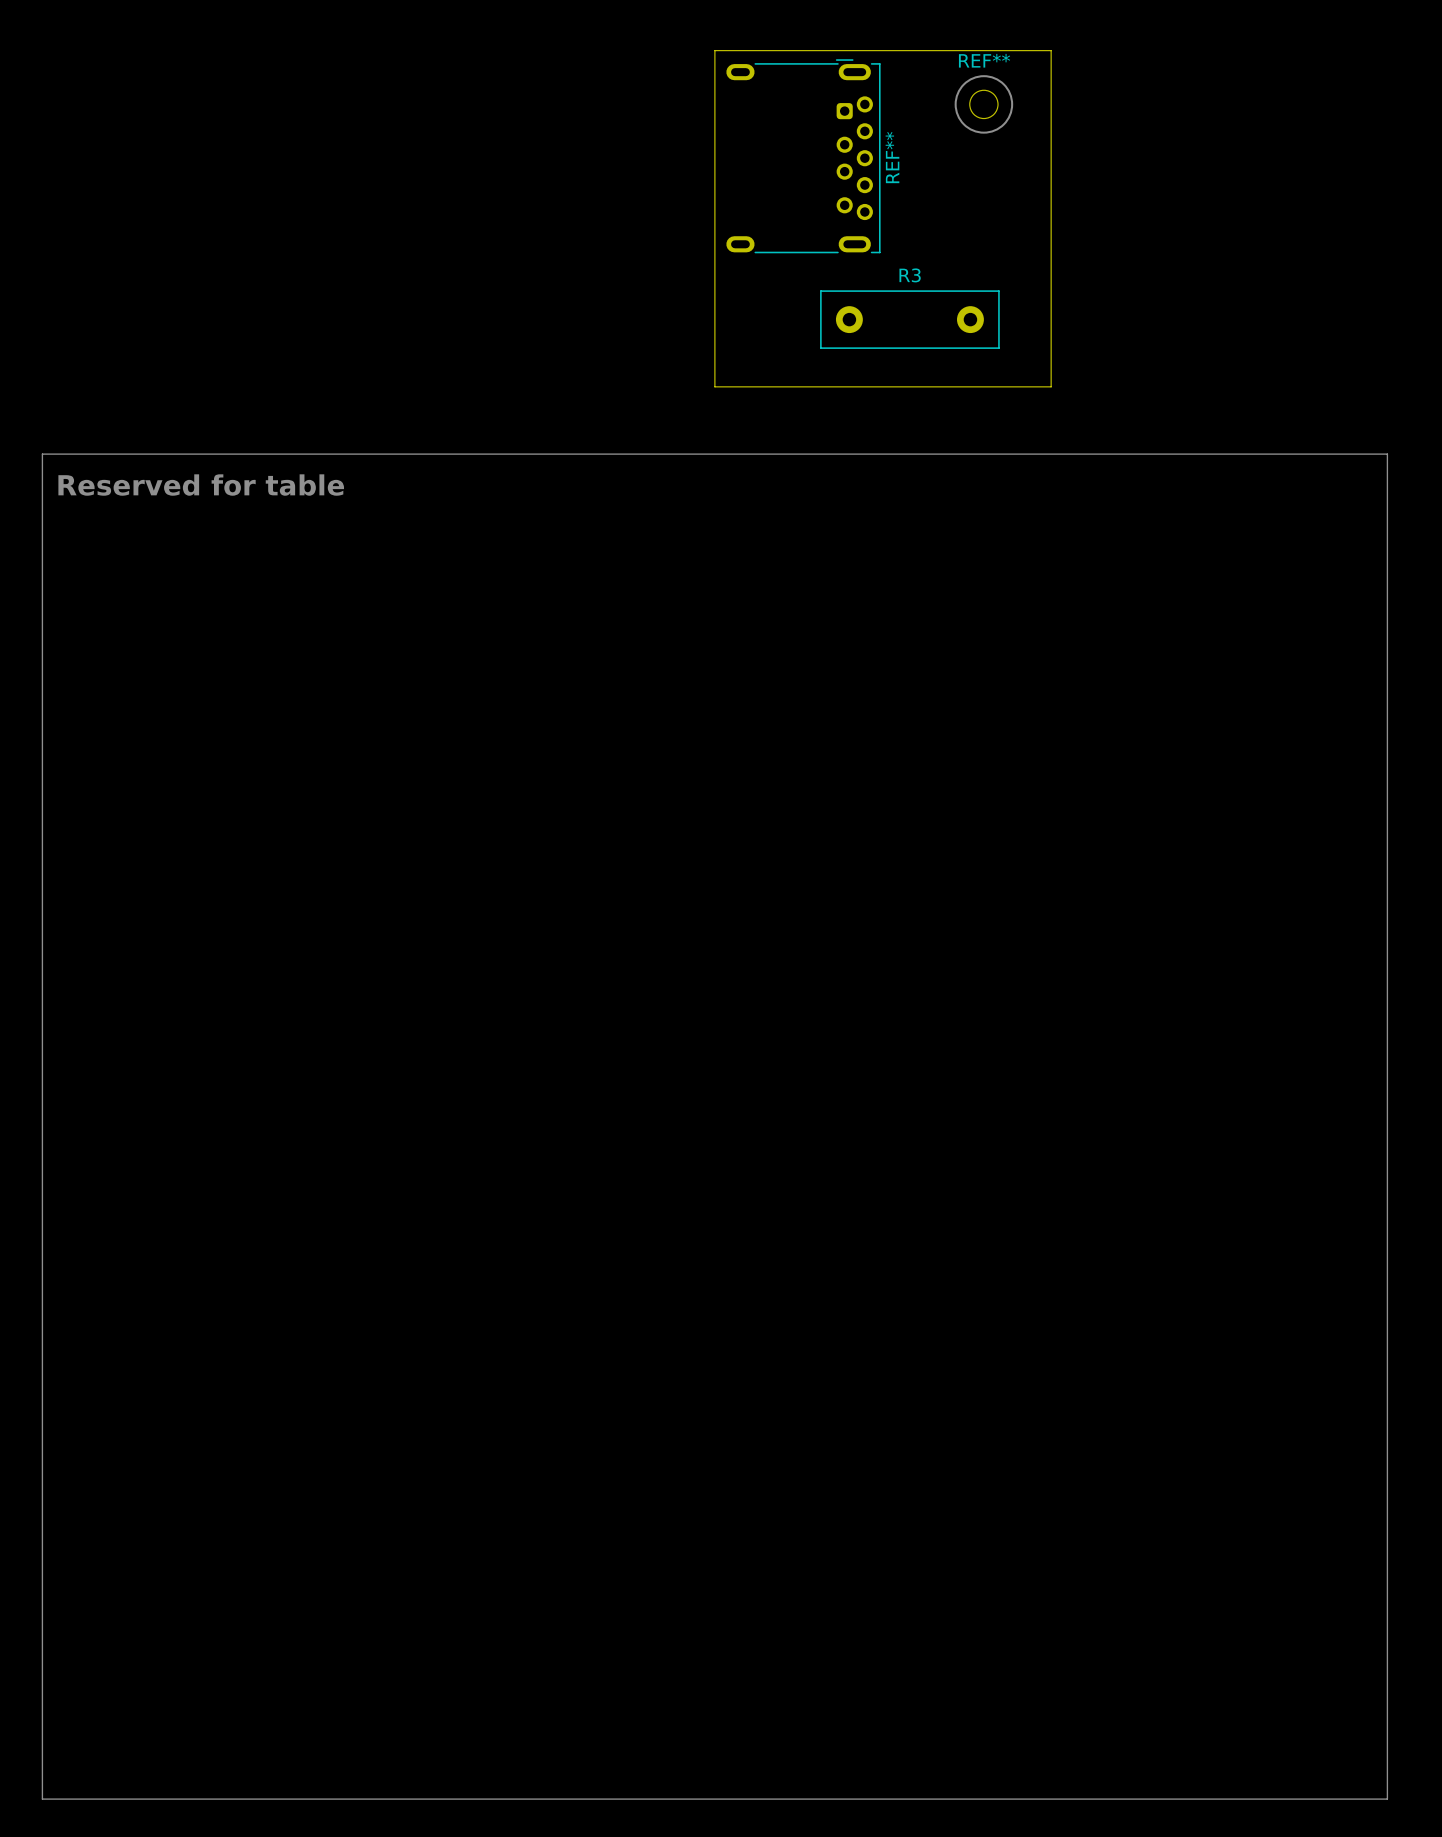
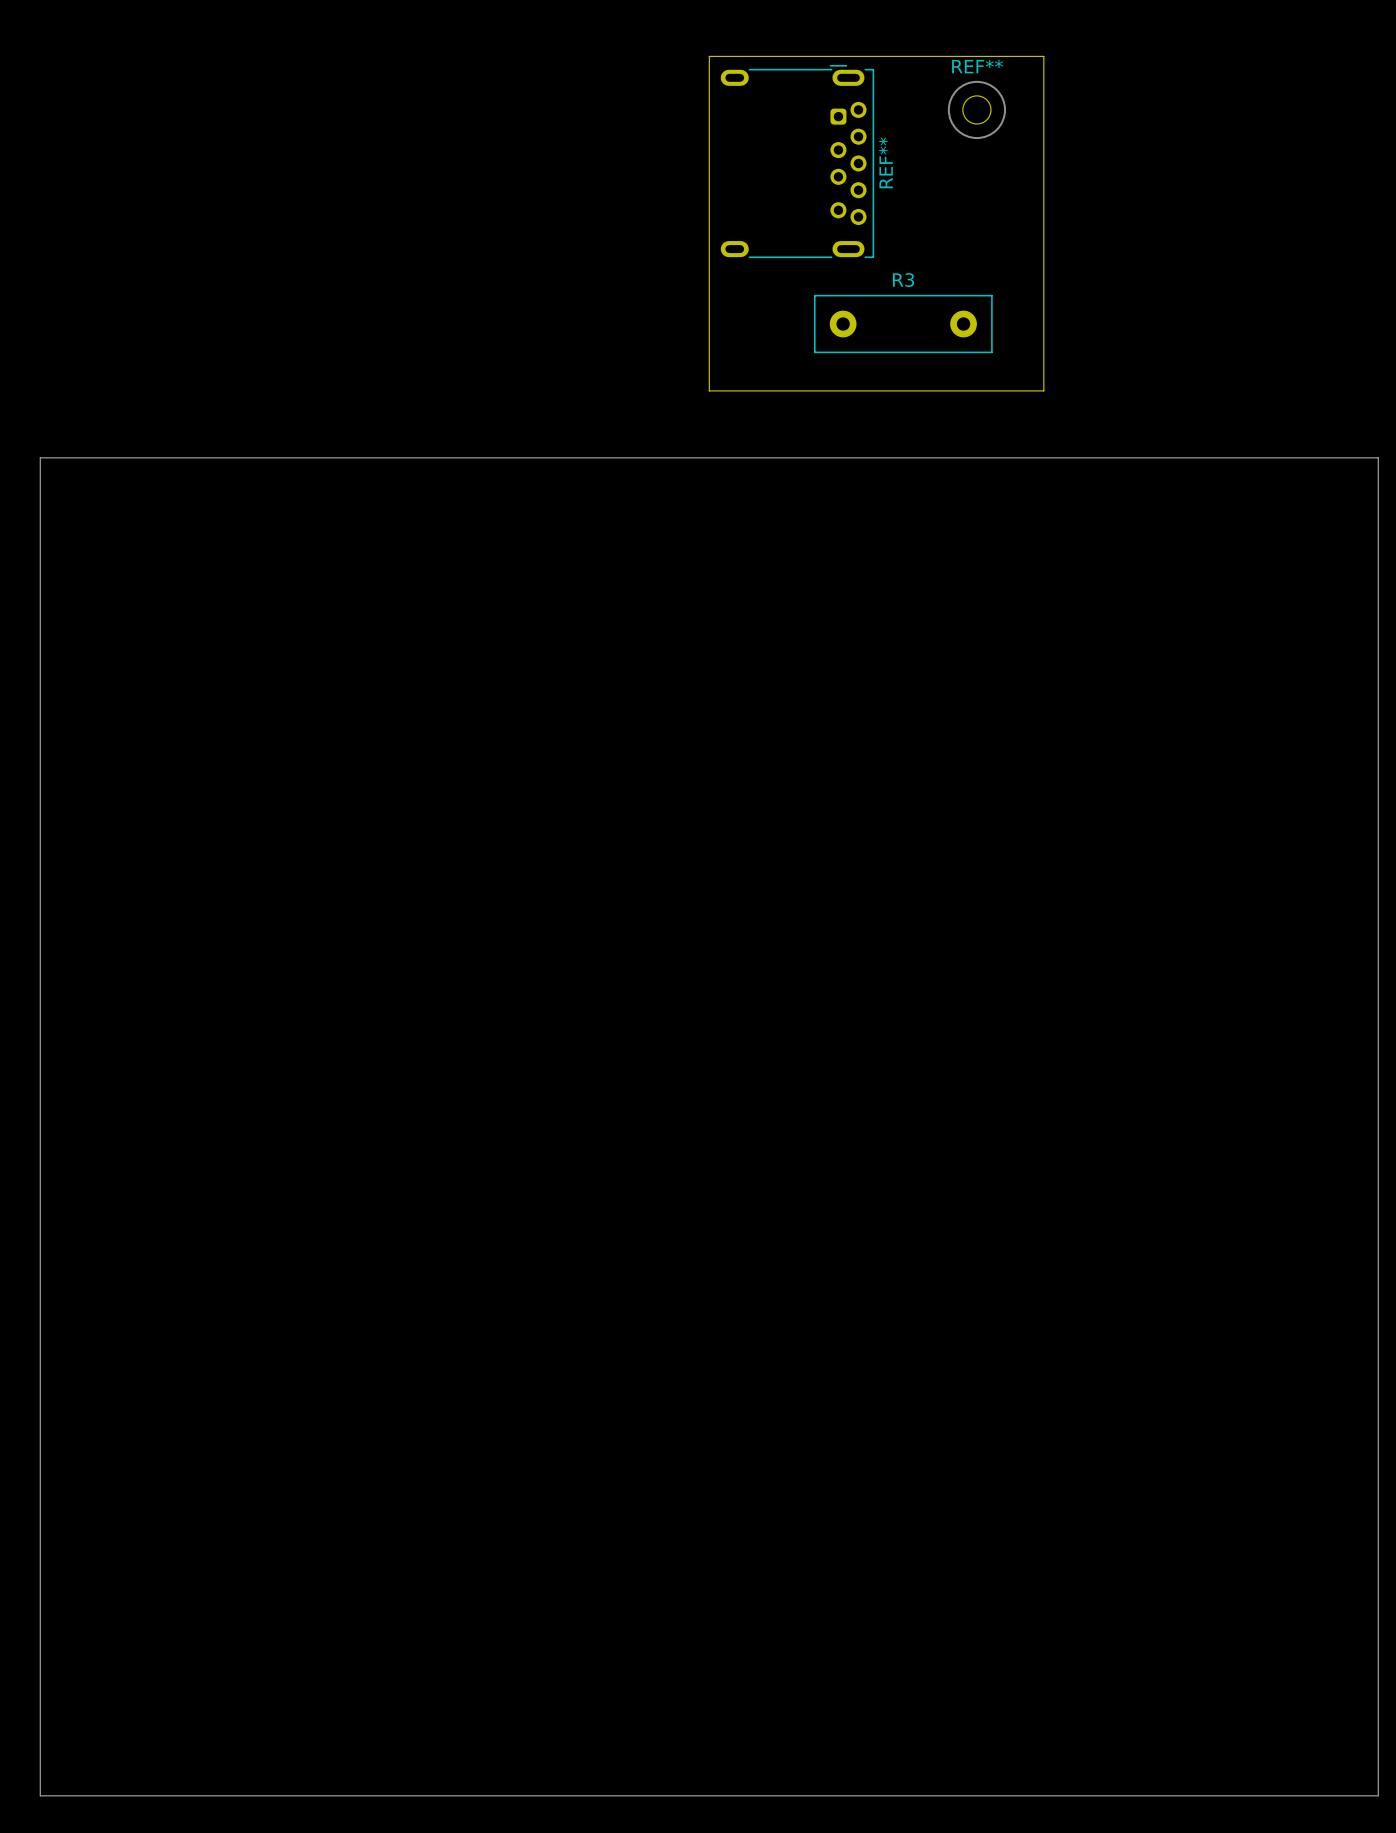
text: Reserved for table (201, 485) -> none

